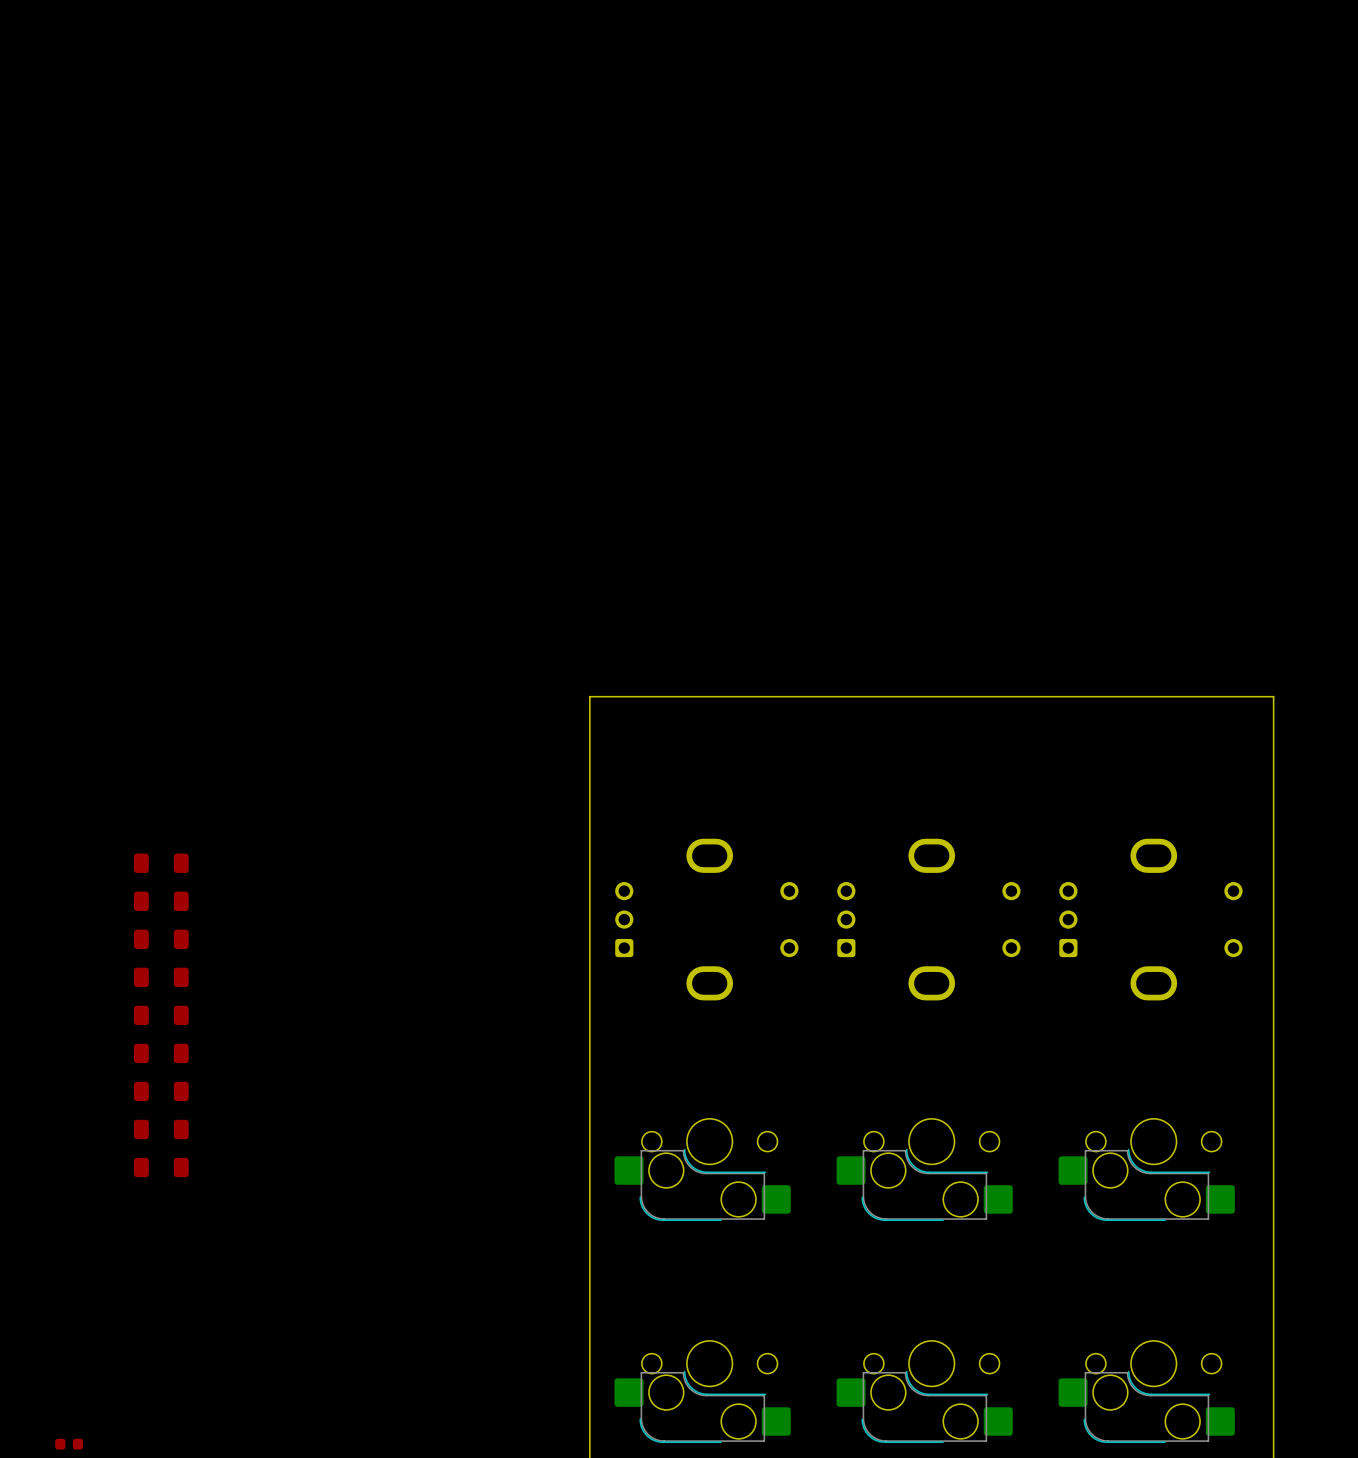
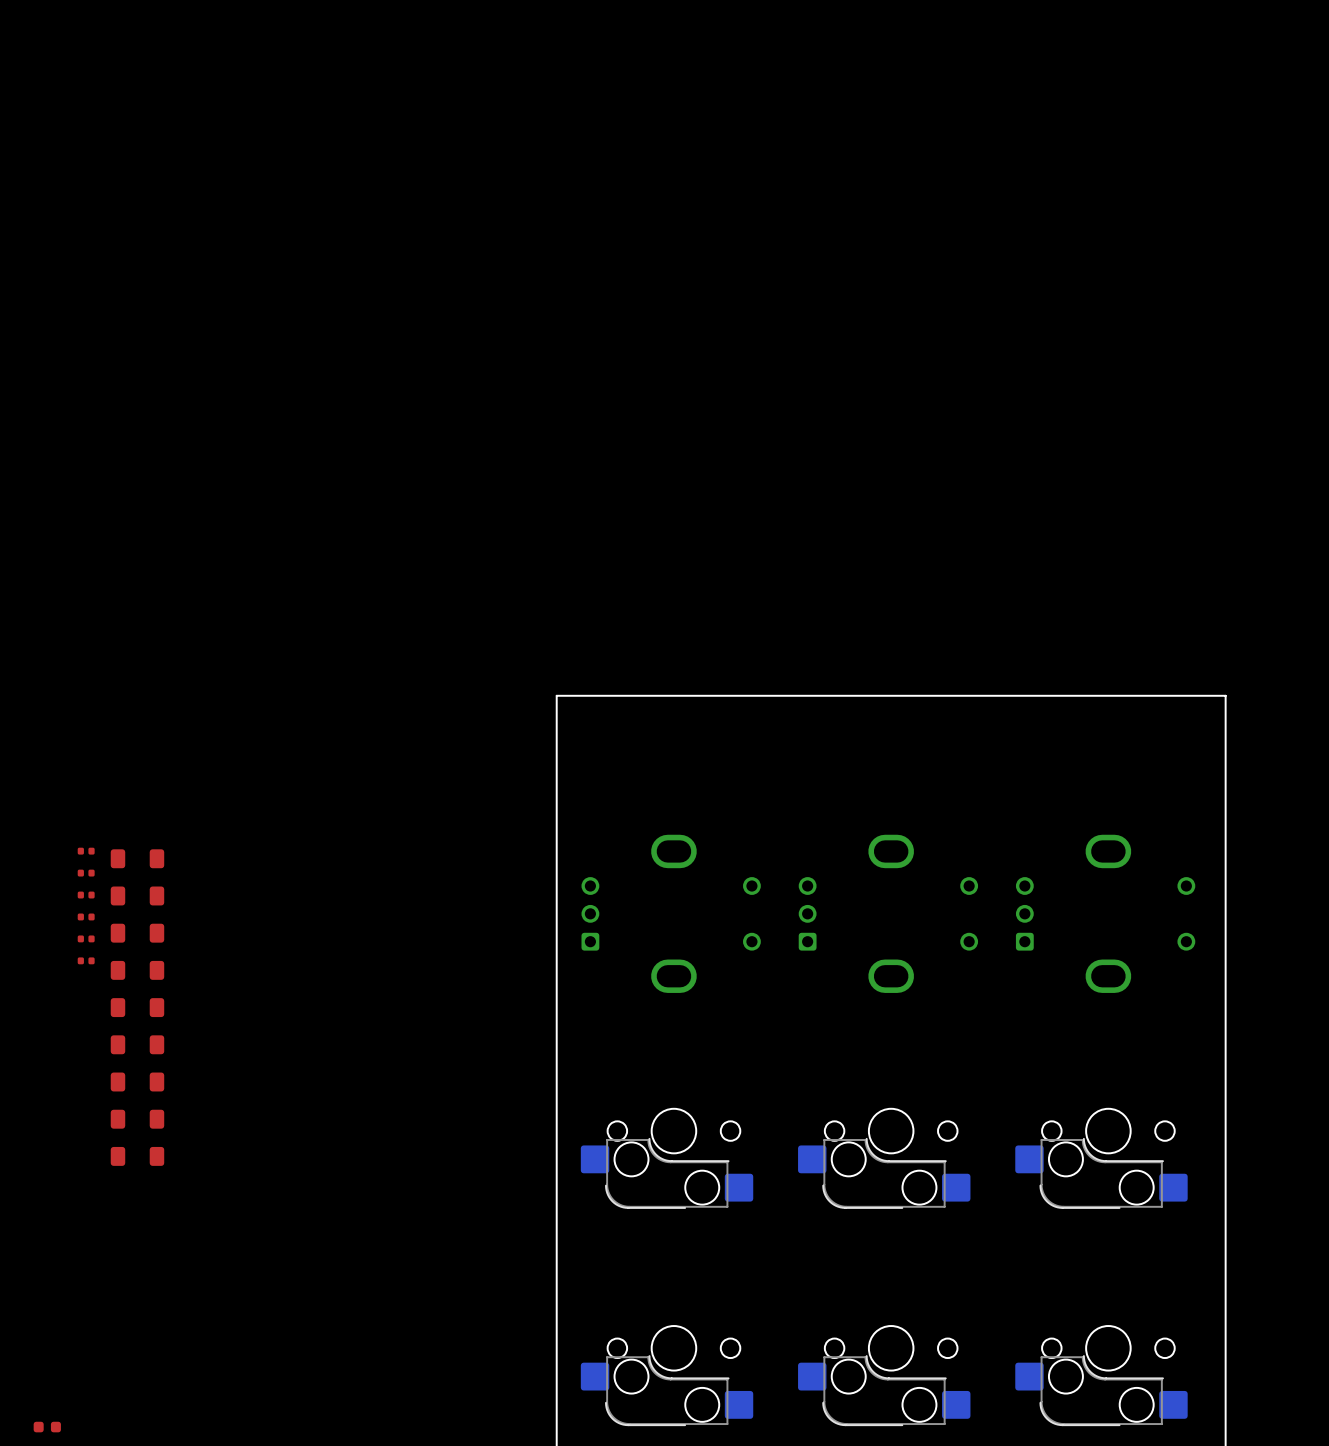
part: none -> (86, 851)
part: none -> (86, 873)
part: none -> (86, 895)
part: none -> (86, 916)
part: none -> (86, 938)
part: none -> (86, 960)

